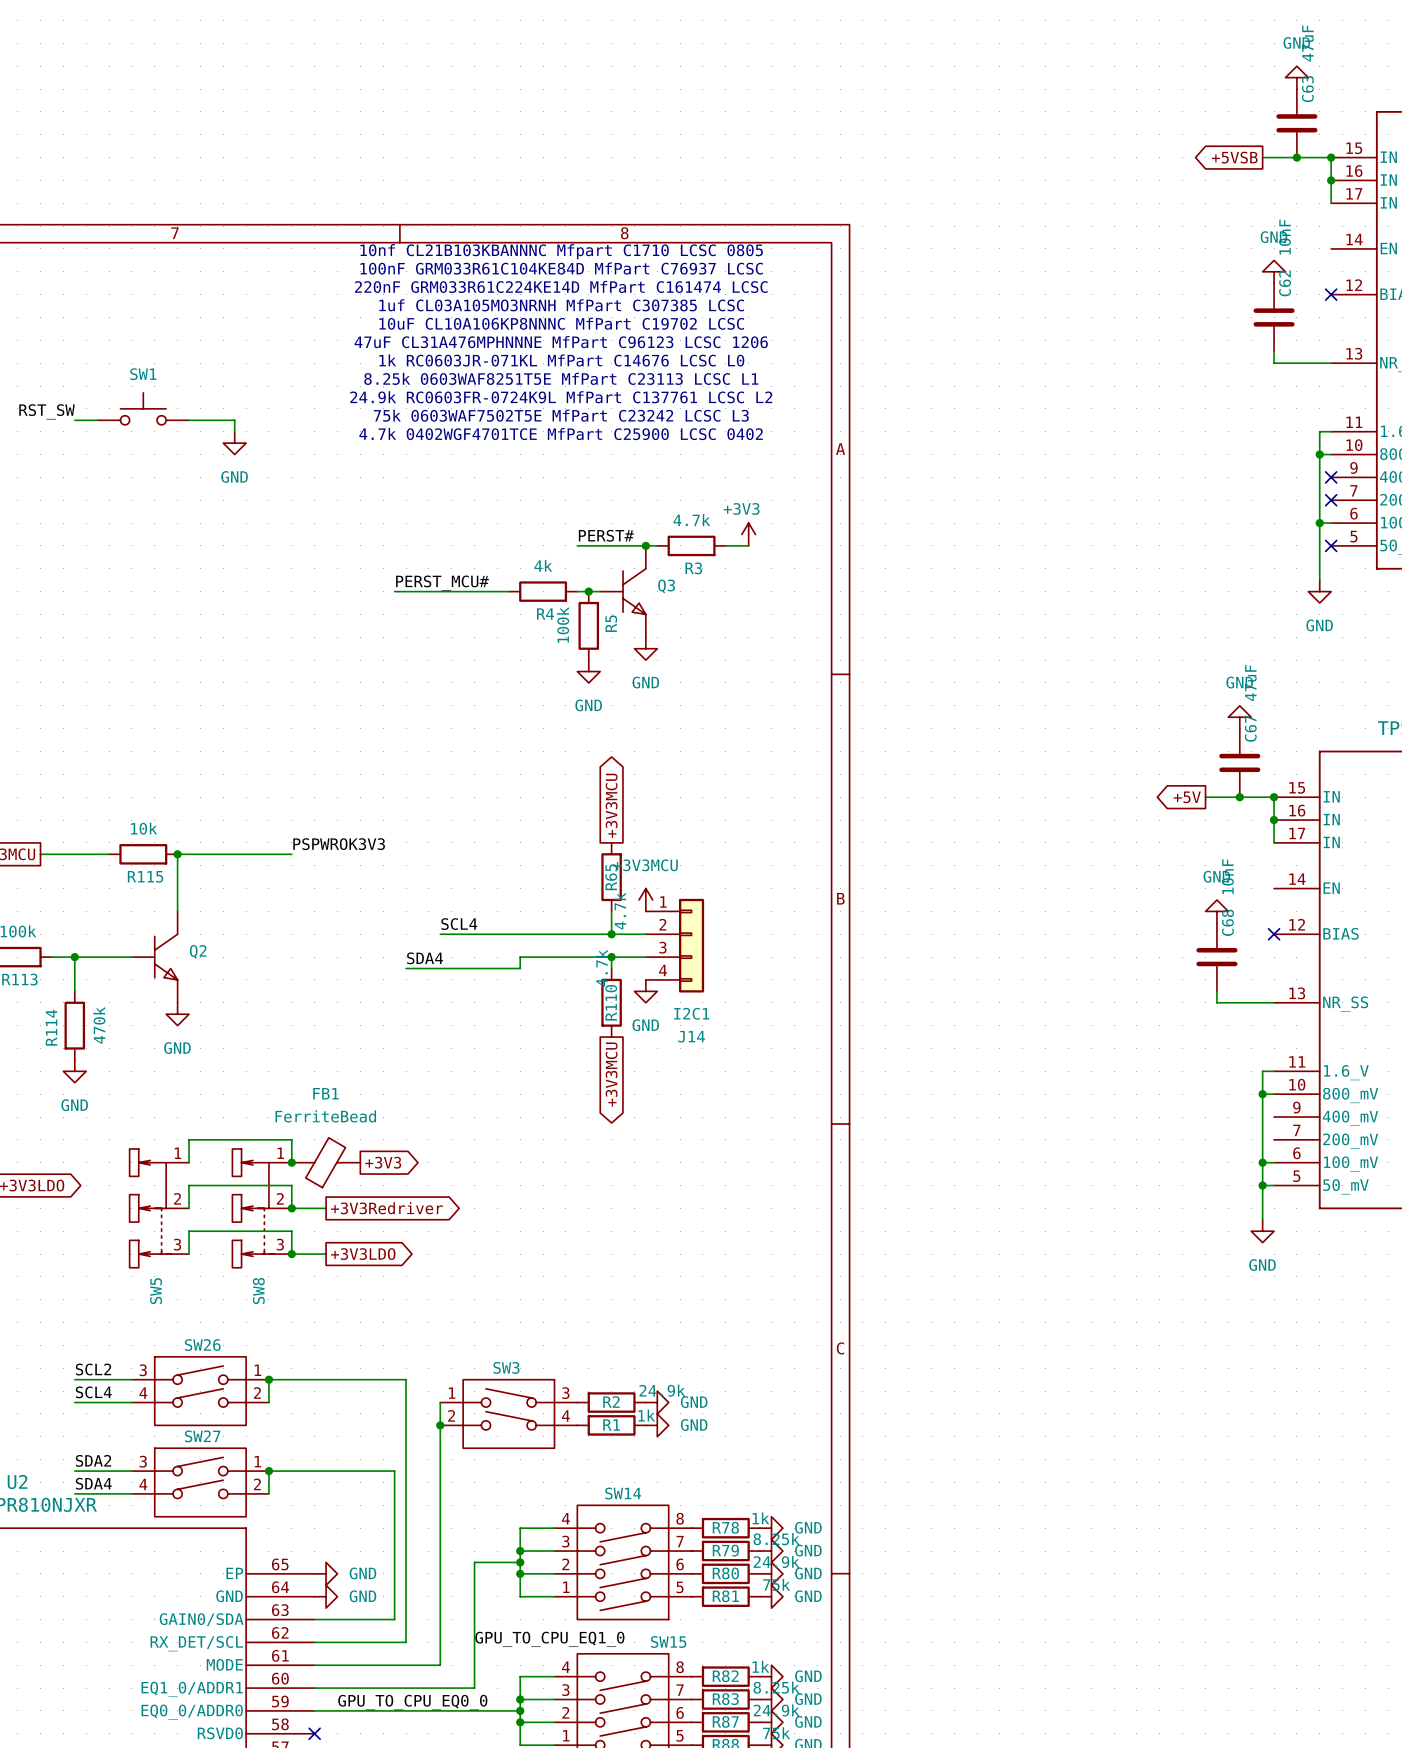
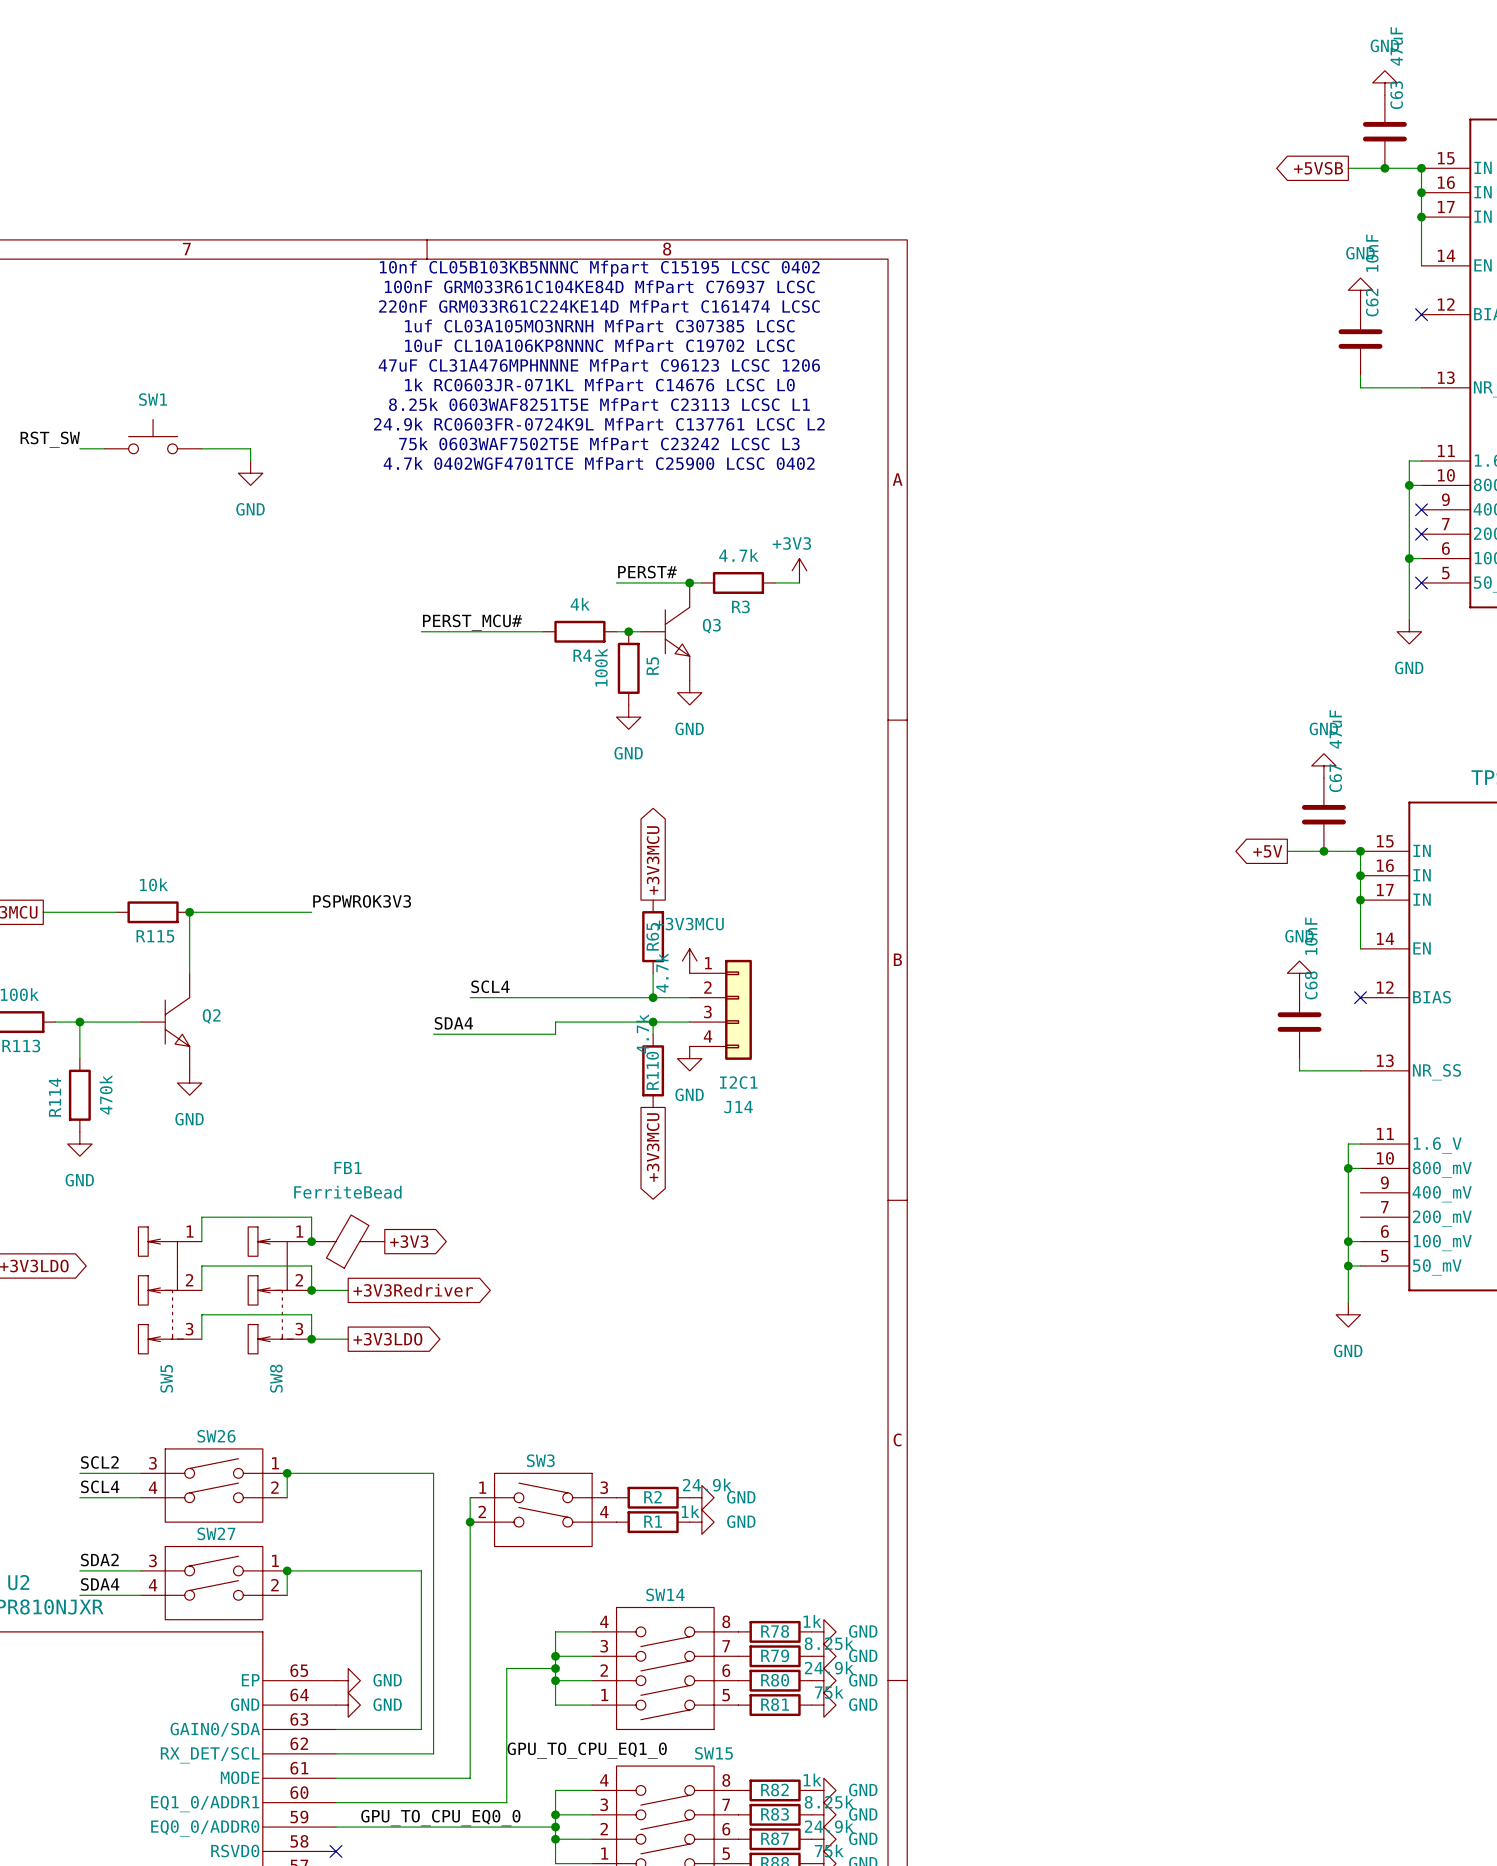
wire: none -> (1421, 217) (1421, 265)
junction: none -> (1421, 217)
text: 10nf CL21B103KBANNNC Mfpart C1710 LCSC 0805 (561, 251) -> 10nf CL05B103KB5NNNC Mfpart C15195 LCSC 0402 (599, 268)
wire: none -> (1360, 900) (1360, 948)
junction: none -> (1360, 900)

